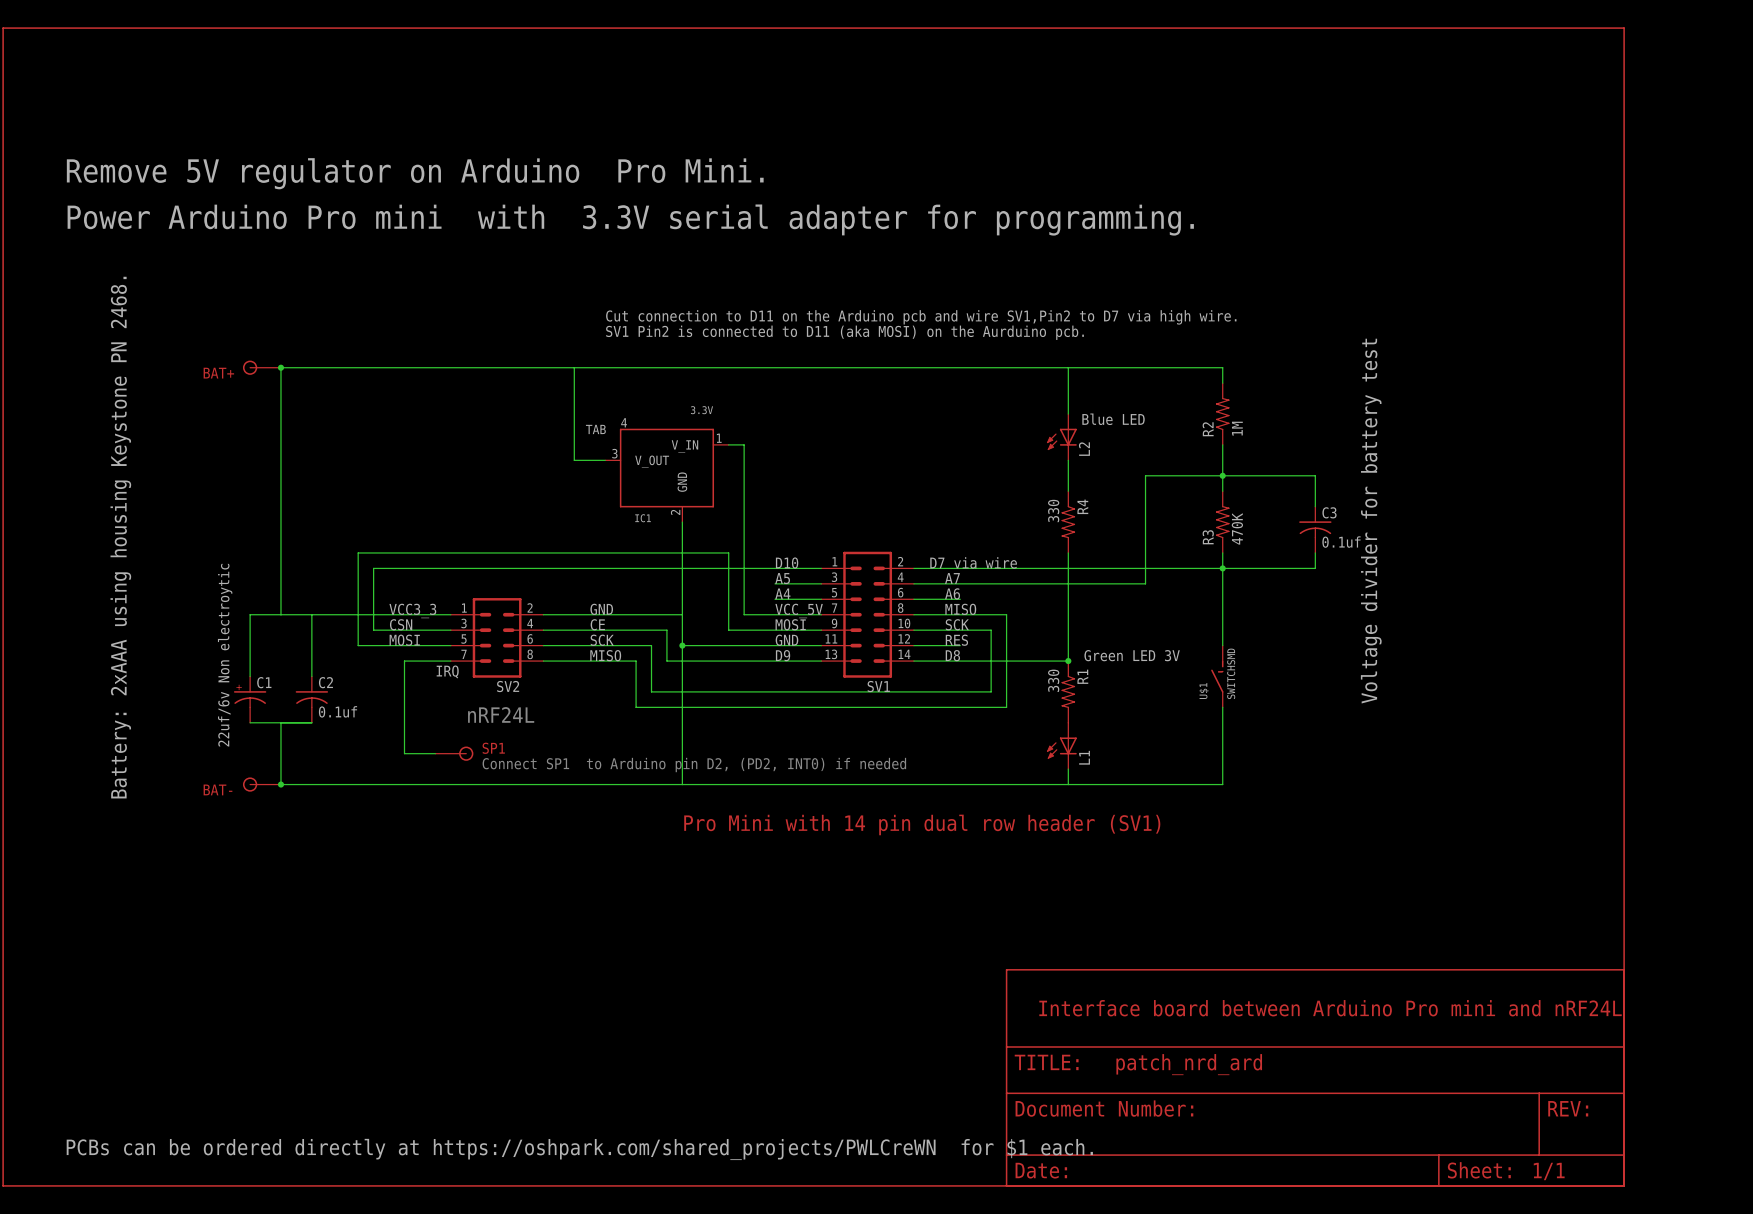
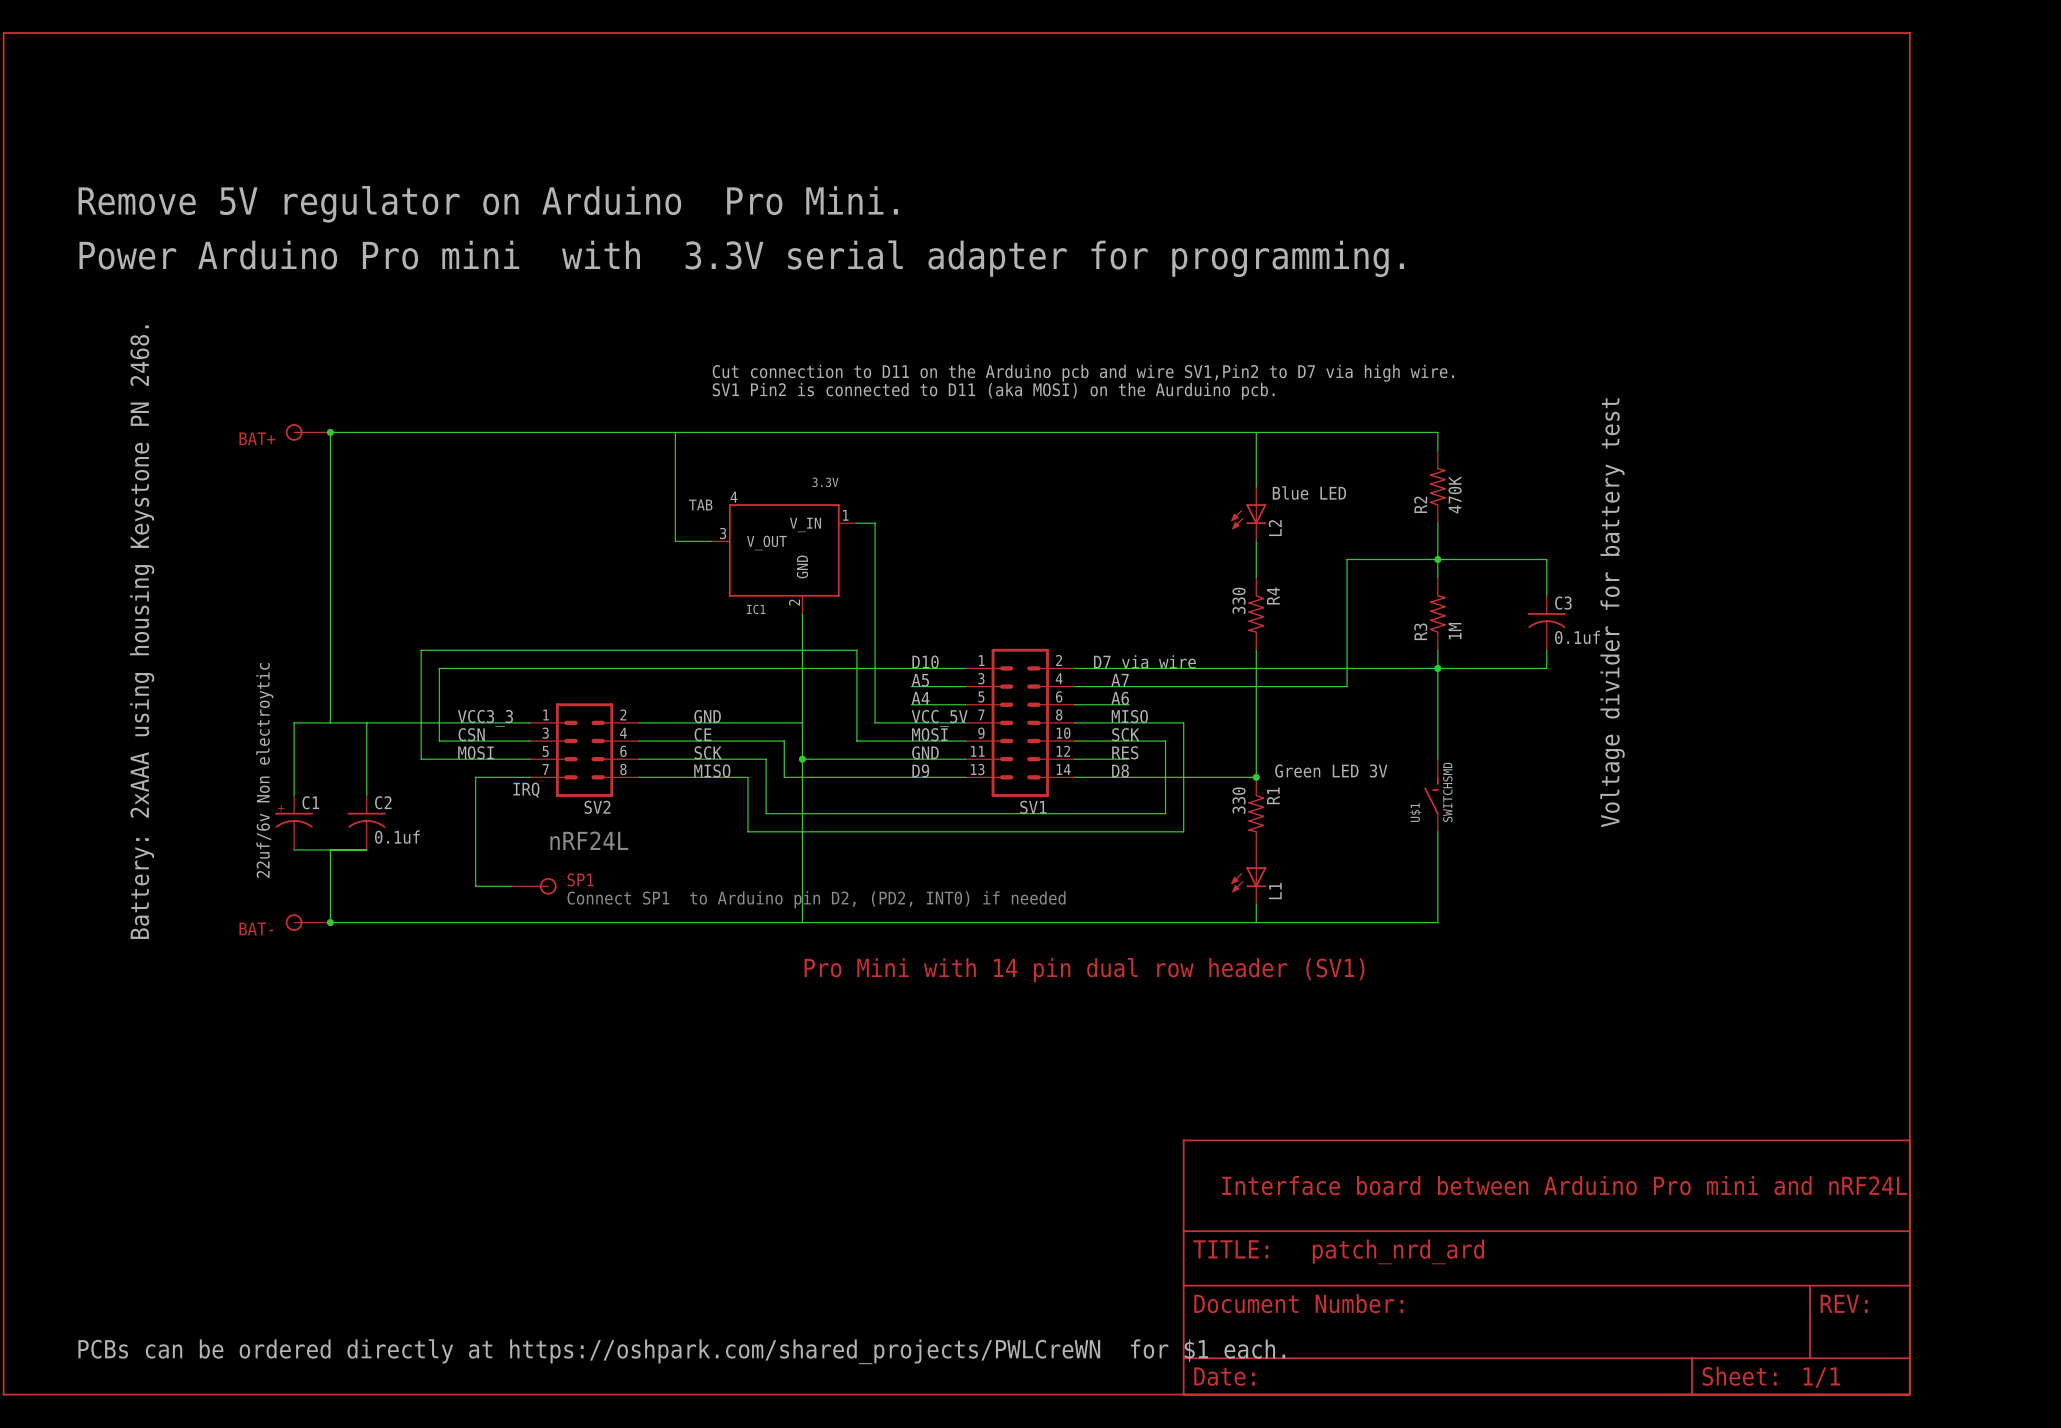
R2 value: 1M (1237, 428) -> 470K (1455, 494)
R3 value: 470K (1237, 528) -> 1M (1455, 631)

